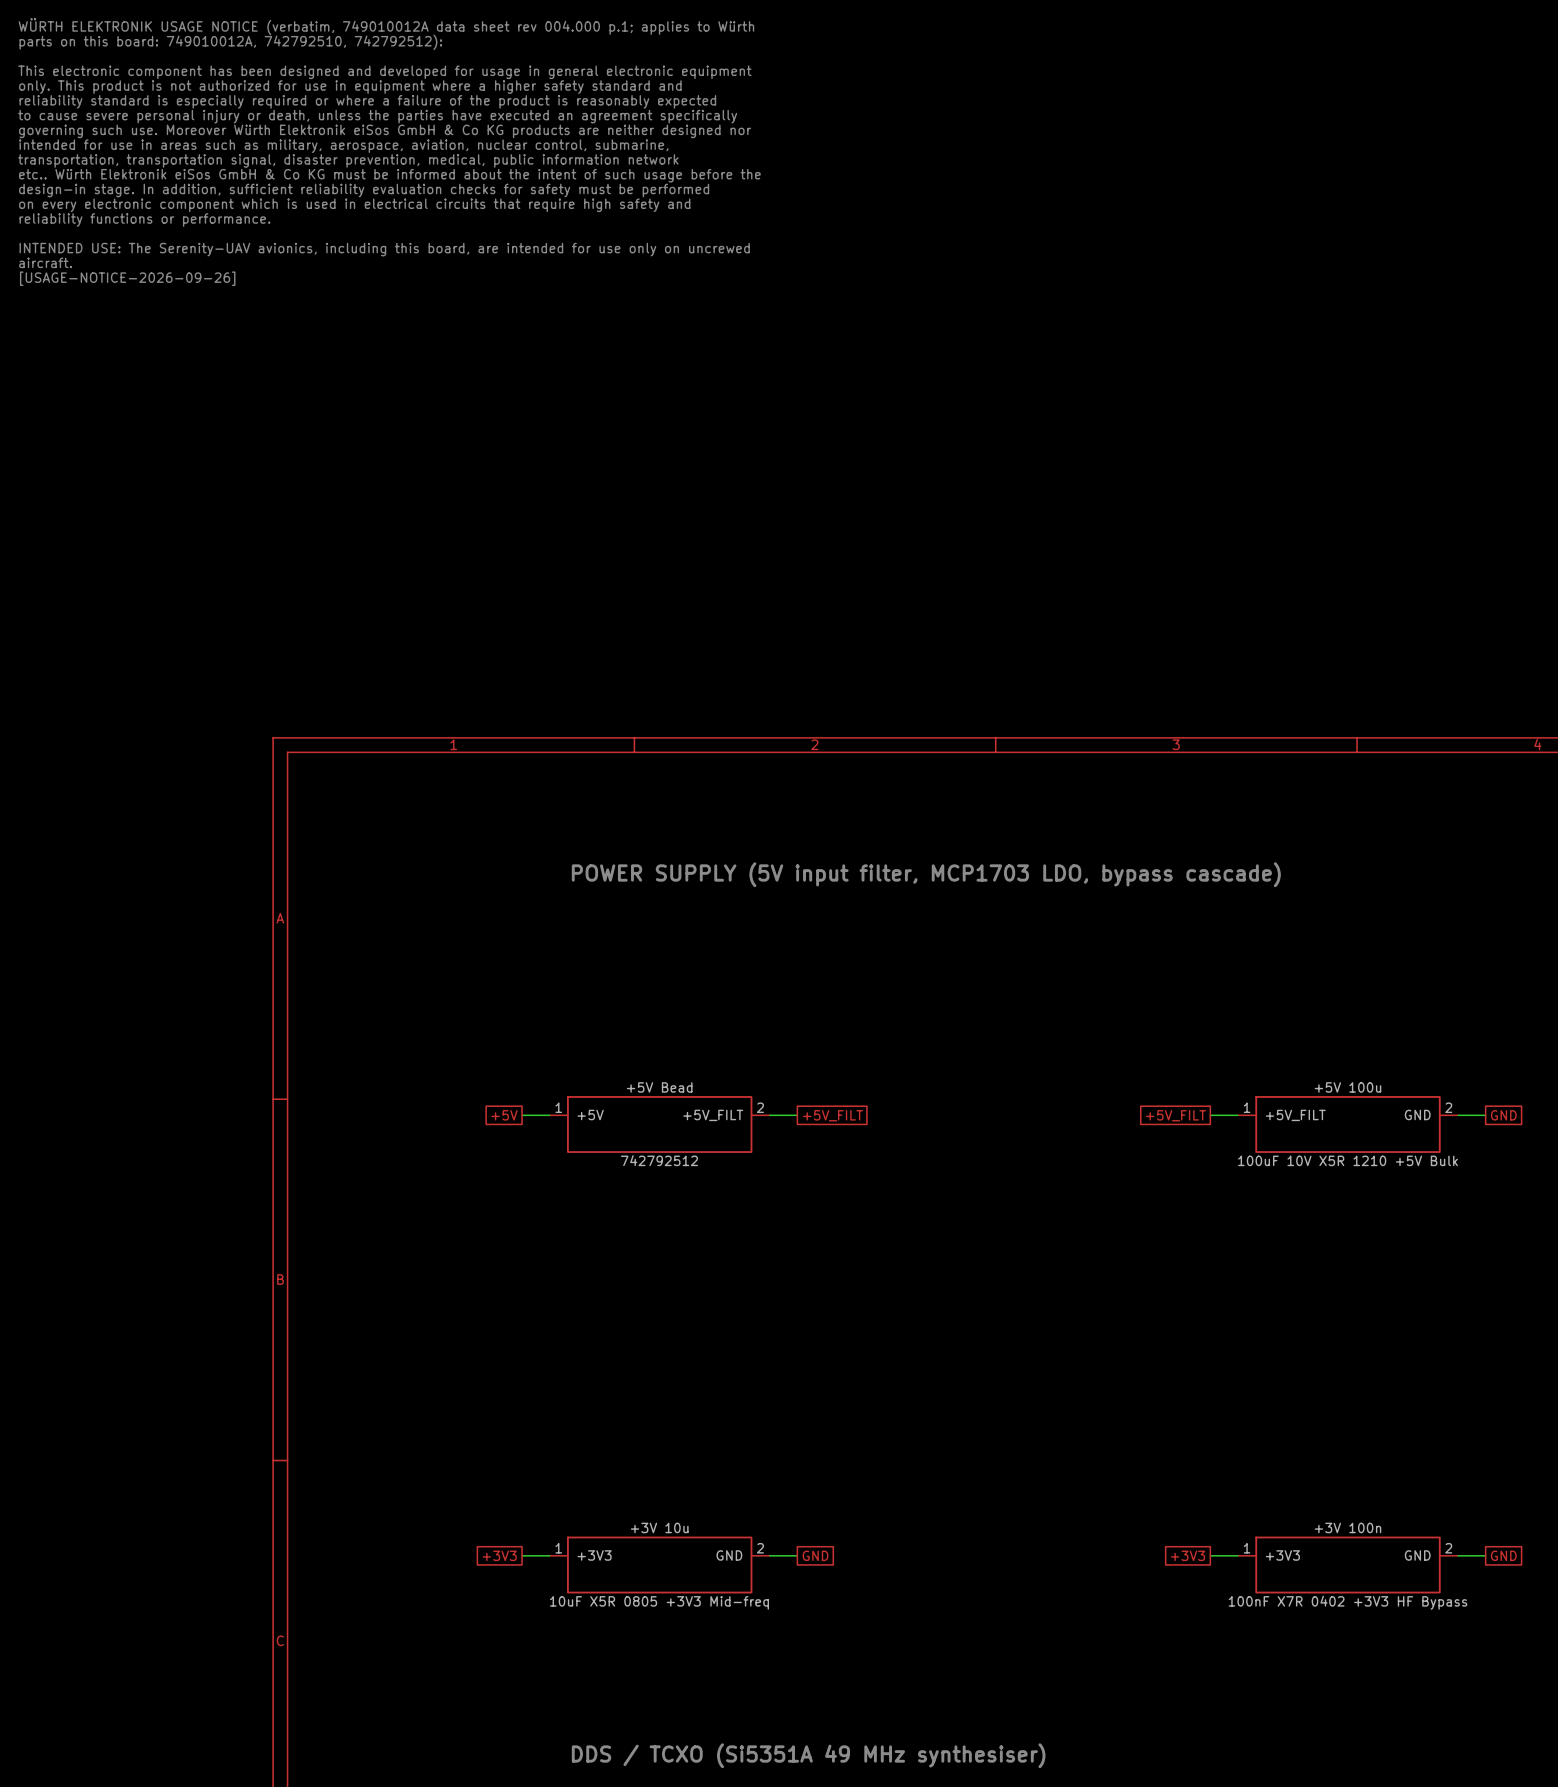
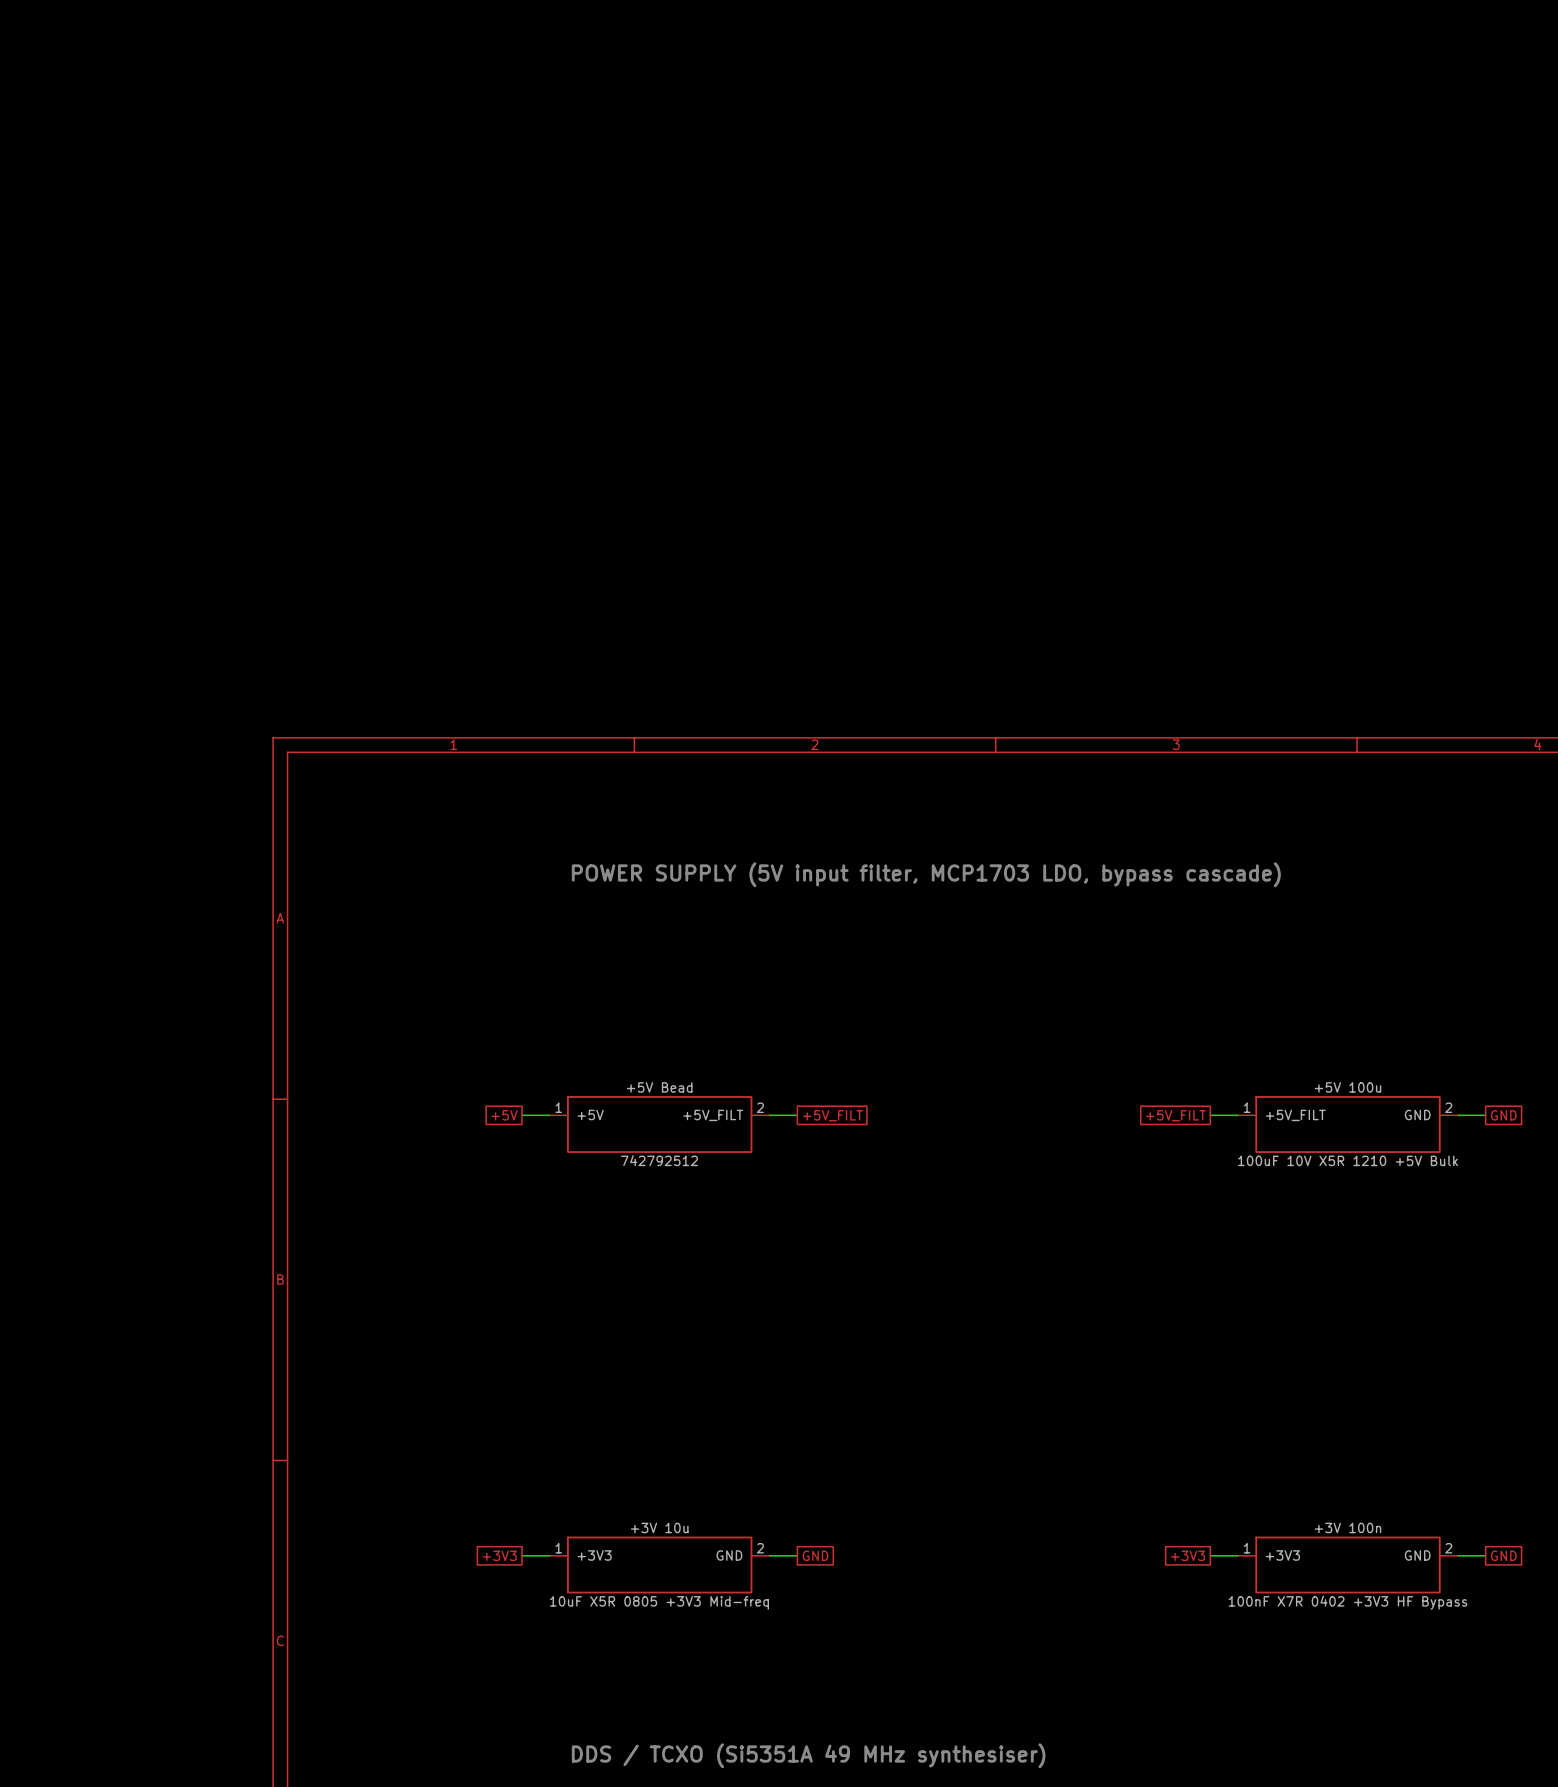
text: WÜRTH ELEKTRONIK USAGE NOTICE (verbatim, 749010012A data sheet rev 004.000 p.1; applies to Würth (386, 26) -> none
text: parts on this board: 749010012A, 742792510, 742792512): (230, 42) -> none
text: This electronic component has been designed and developed for usage in general electronic equipment (384, 72) -> none
text: only. This product is not authorized for use in equipment where a higher safety standard and (350, 87) -> none
text: reliability standard is especially required or where a failure of the product is reasonably expected (367, 101) -> none
text: to cause severe personal injury or death, unless the parties have executed an agreement specifically (377, 116) -> none
text: governing such use. Moreover Würth Elektronik eiSos GmbH & Co KG products are neither designed nor (385, 131) -> none
text: intended for use in areas such as military, aerospace, aviation, nuclear control, submarine, (343, 146) -> none
text: transportation, transportation signal, disaster prevention, medical, public information network (348, 160) -> none
text: etc.. Würth Elektronik eiSos GmbH & Co KG must be informed about the intent of such usage before the (389, 175) -> none
text: design-in stage. In addition, sufficient reliability evaluation checks for safety must be performed (364, 190) -> none
text: on every electronic component which is used in electrical circuits that require high safety and (354, 205) -> none
text: reliability functions or performance. (144, 220) -> none
text: INTENDED USE: The Serenity-UAV avionics, including this board, are intended for use only on uncrewed (384, 249) -> none
text: aircraft. (45, 262) -> none
text: [USAGE-NOTICE-2026-09-26] (127, 278) -> none

